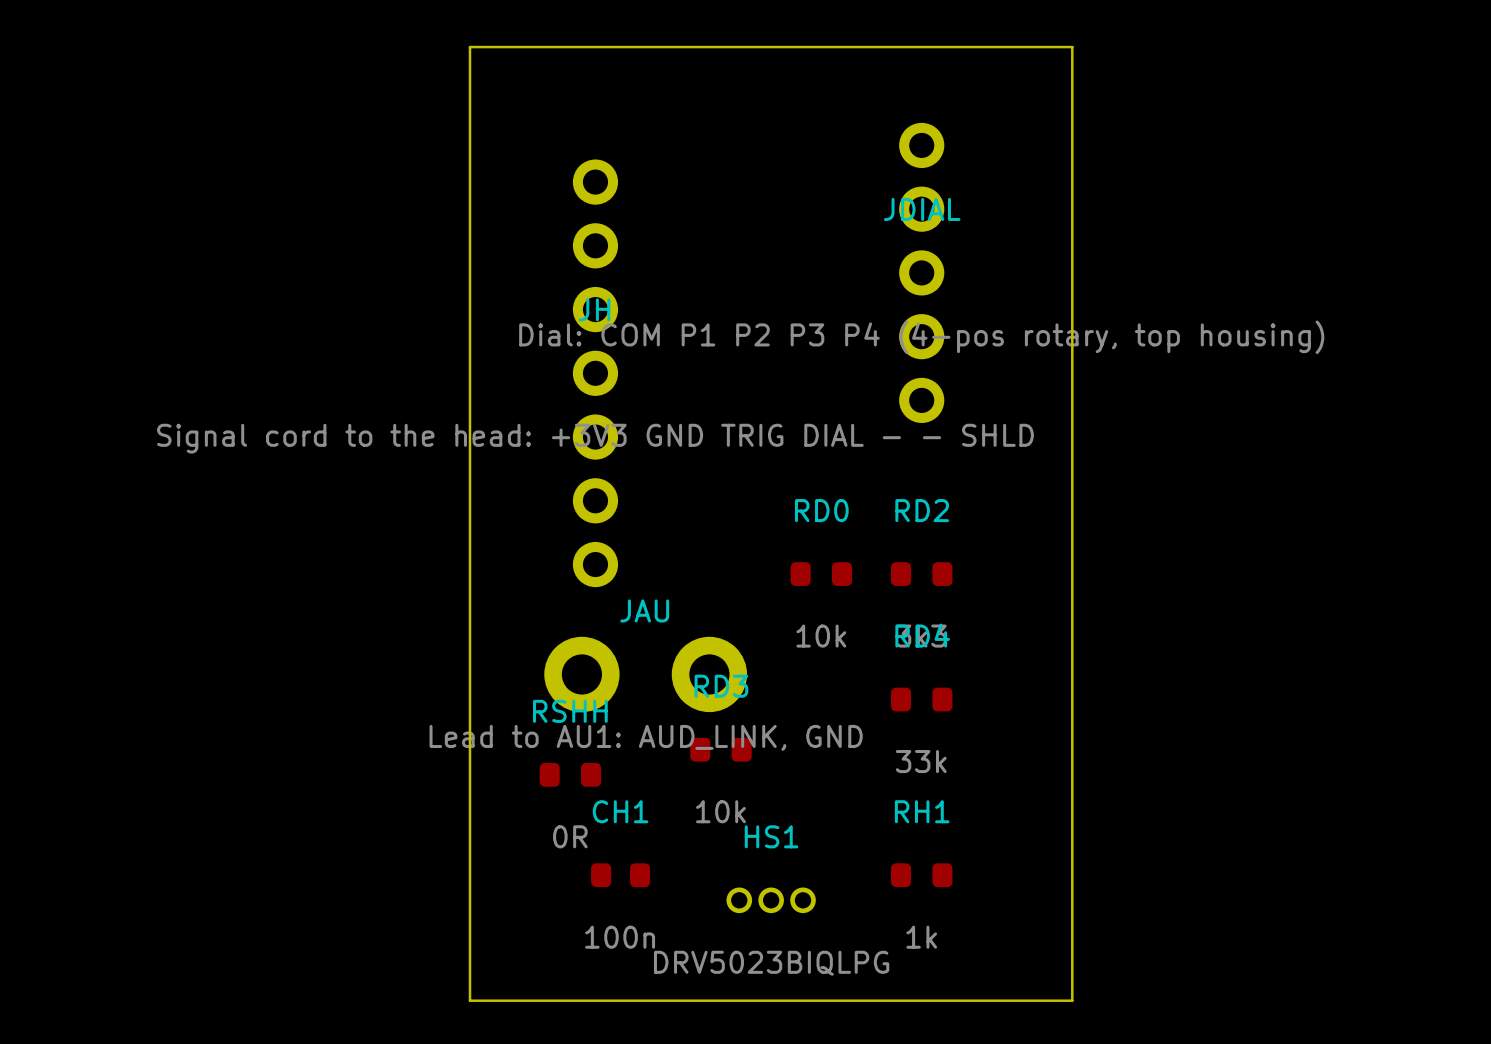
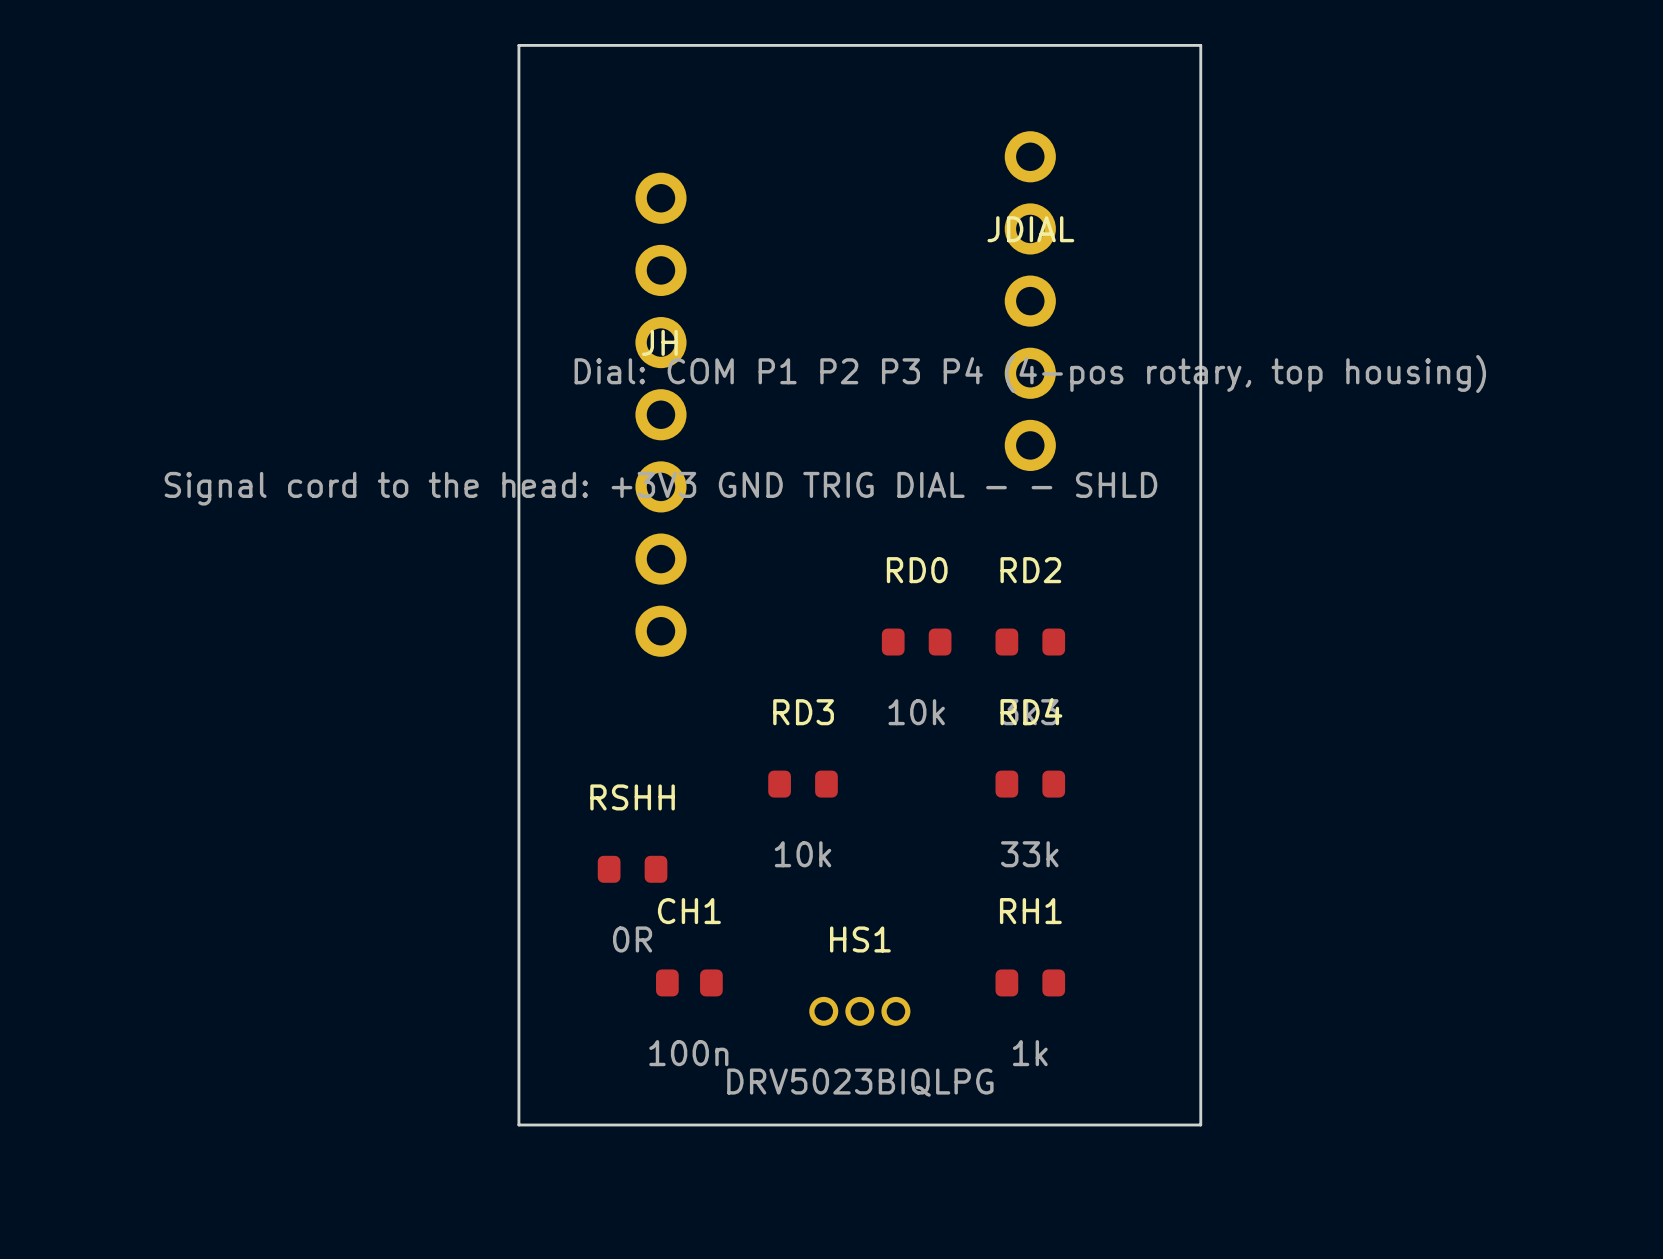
JAU: Lead to AU1: AUD_LINK, GND (645, 674) -> none
RD3 position: (720, 749) -> (803, 784)

